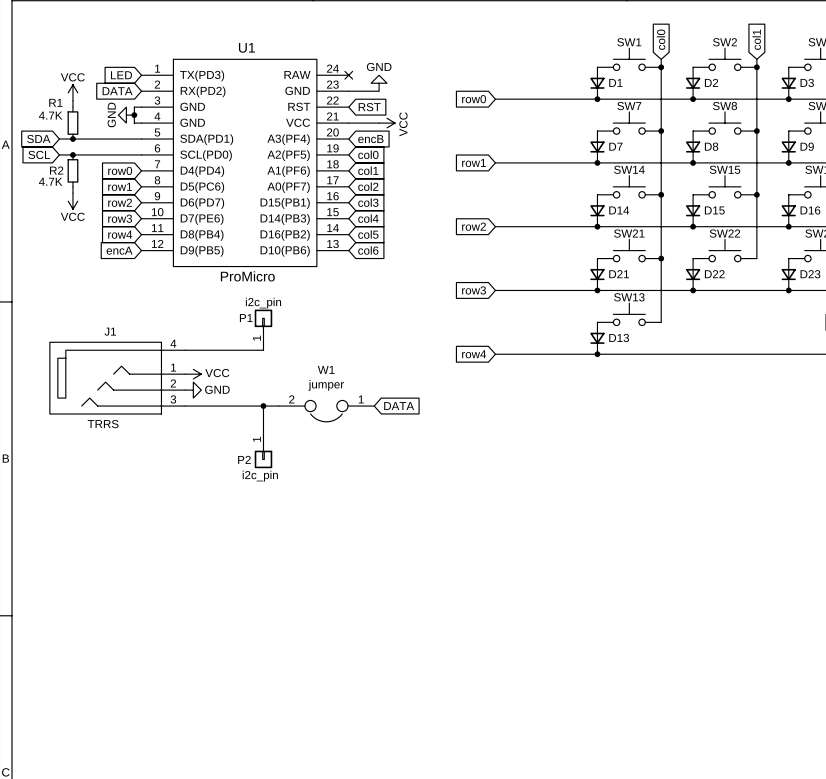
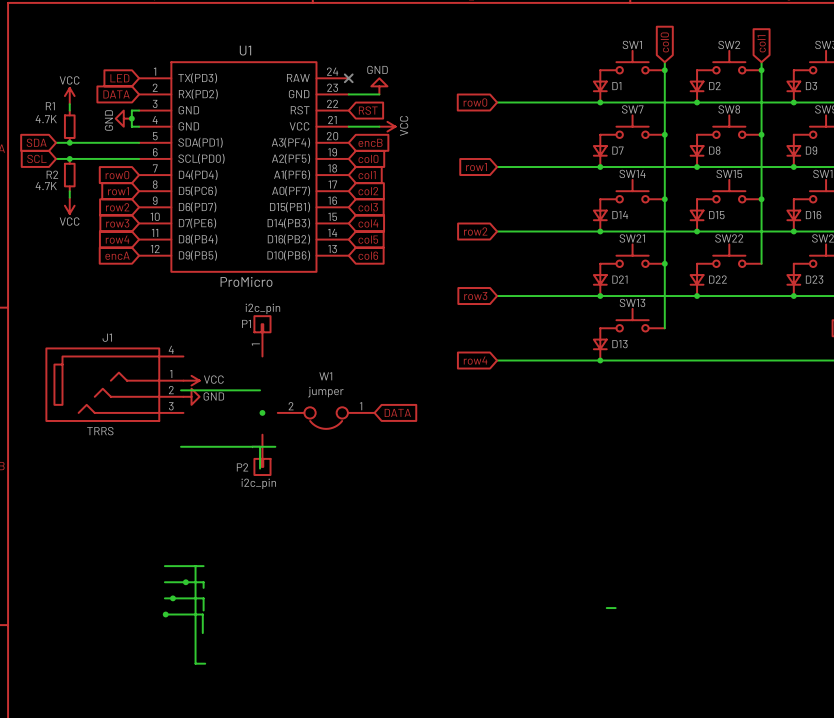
wire: (185, 350) (263, 350) -> (181, 390) (260, 390)
wire: (185, 406) (278, 406) -> (181, 446) (275, 446)
wire: (263, 406) (263, 427) -> (260, 446) (260, 468)
wire: none -> (164, 566) (203, 566)
wire: none -> (195, 566) (195, 663) (205, 663)
wire: none -> (164, 582) (203, 582) (203, 587)
junction: none -> (185, 582)
wire: none -> (164, 598) (203, 598) (203, 610)
junction: none -> (172, 598)
wire: none -> (606, 608) (615, 608)
wire: none -> (164, 614) (202, 614) (202, 633)
junction: none -> (165, 614)

